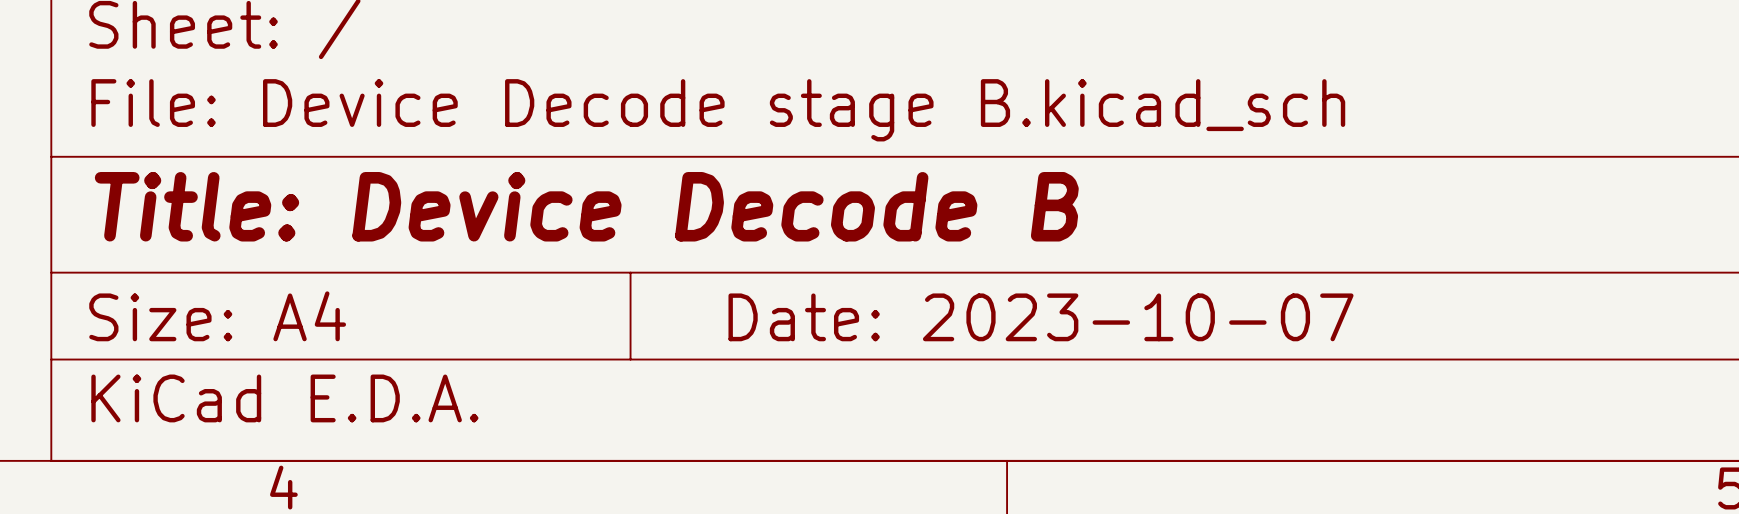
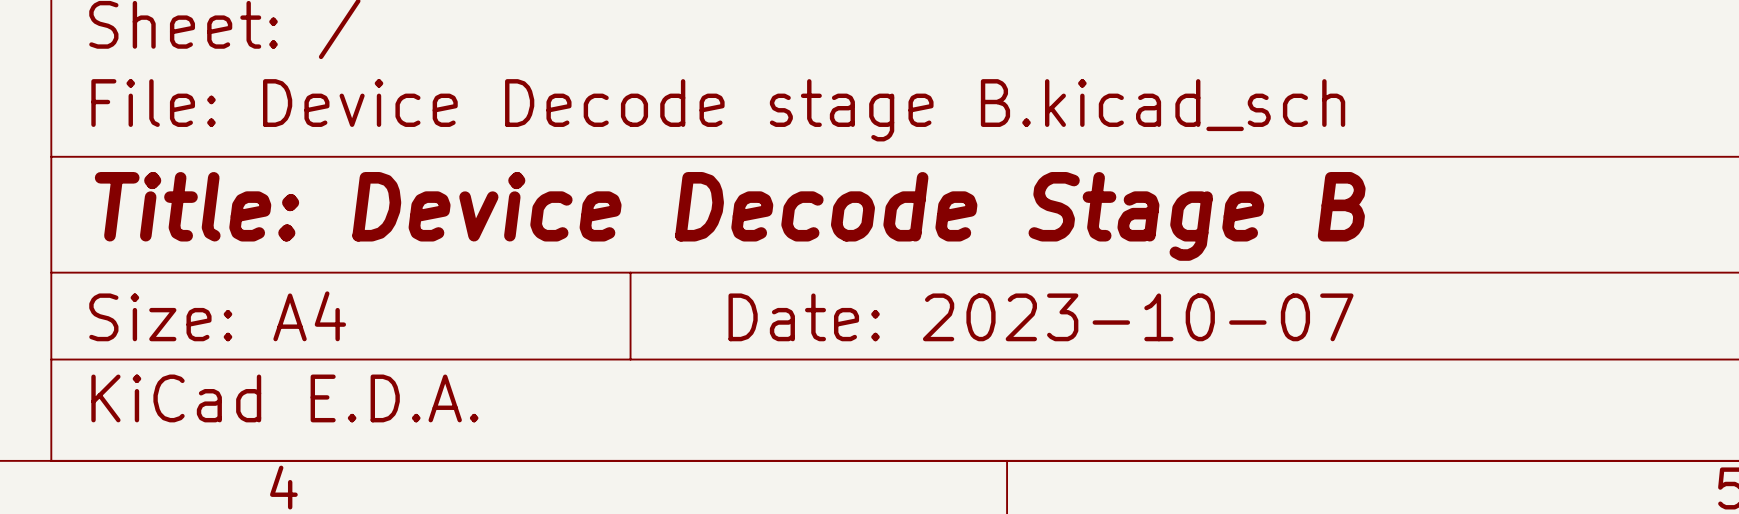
title block: Title: Device Decode B (586, 206) -> Title: Device Decode Stage B (730, 216)

